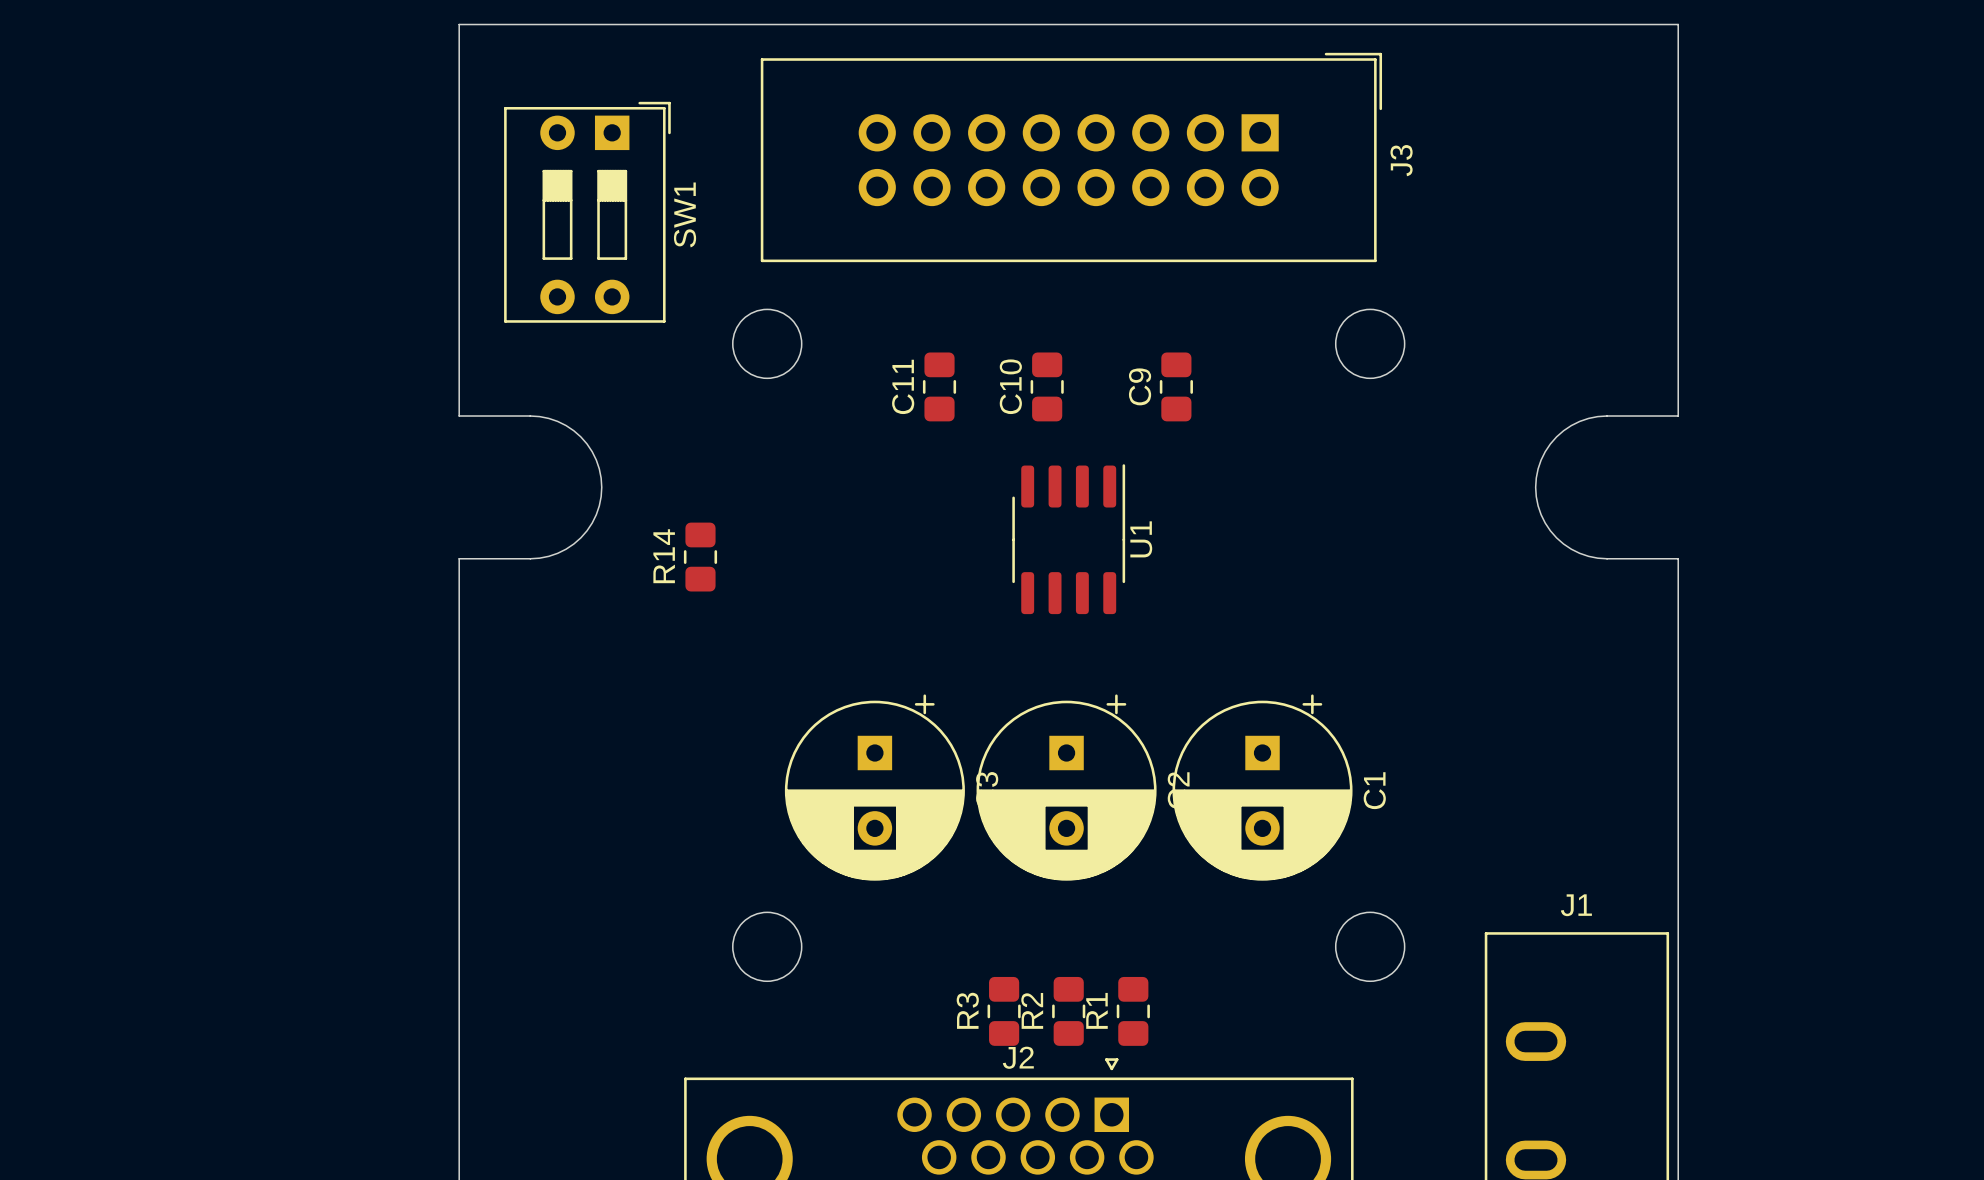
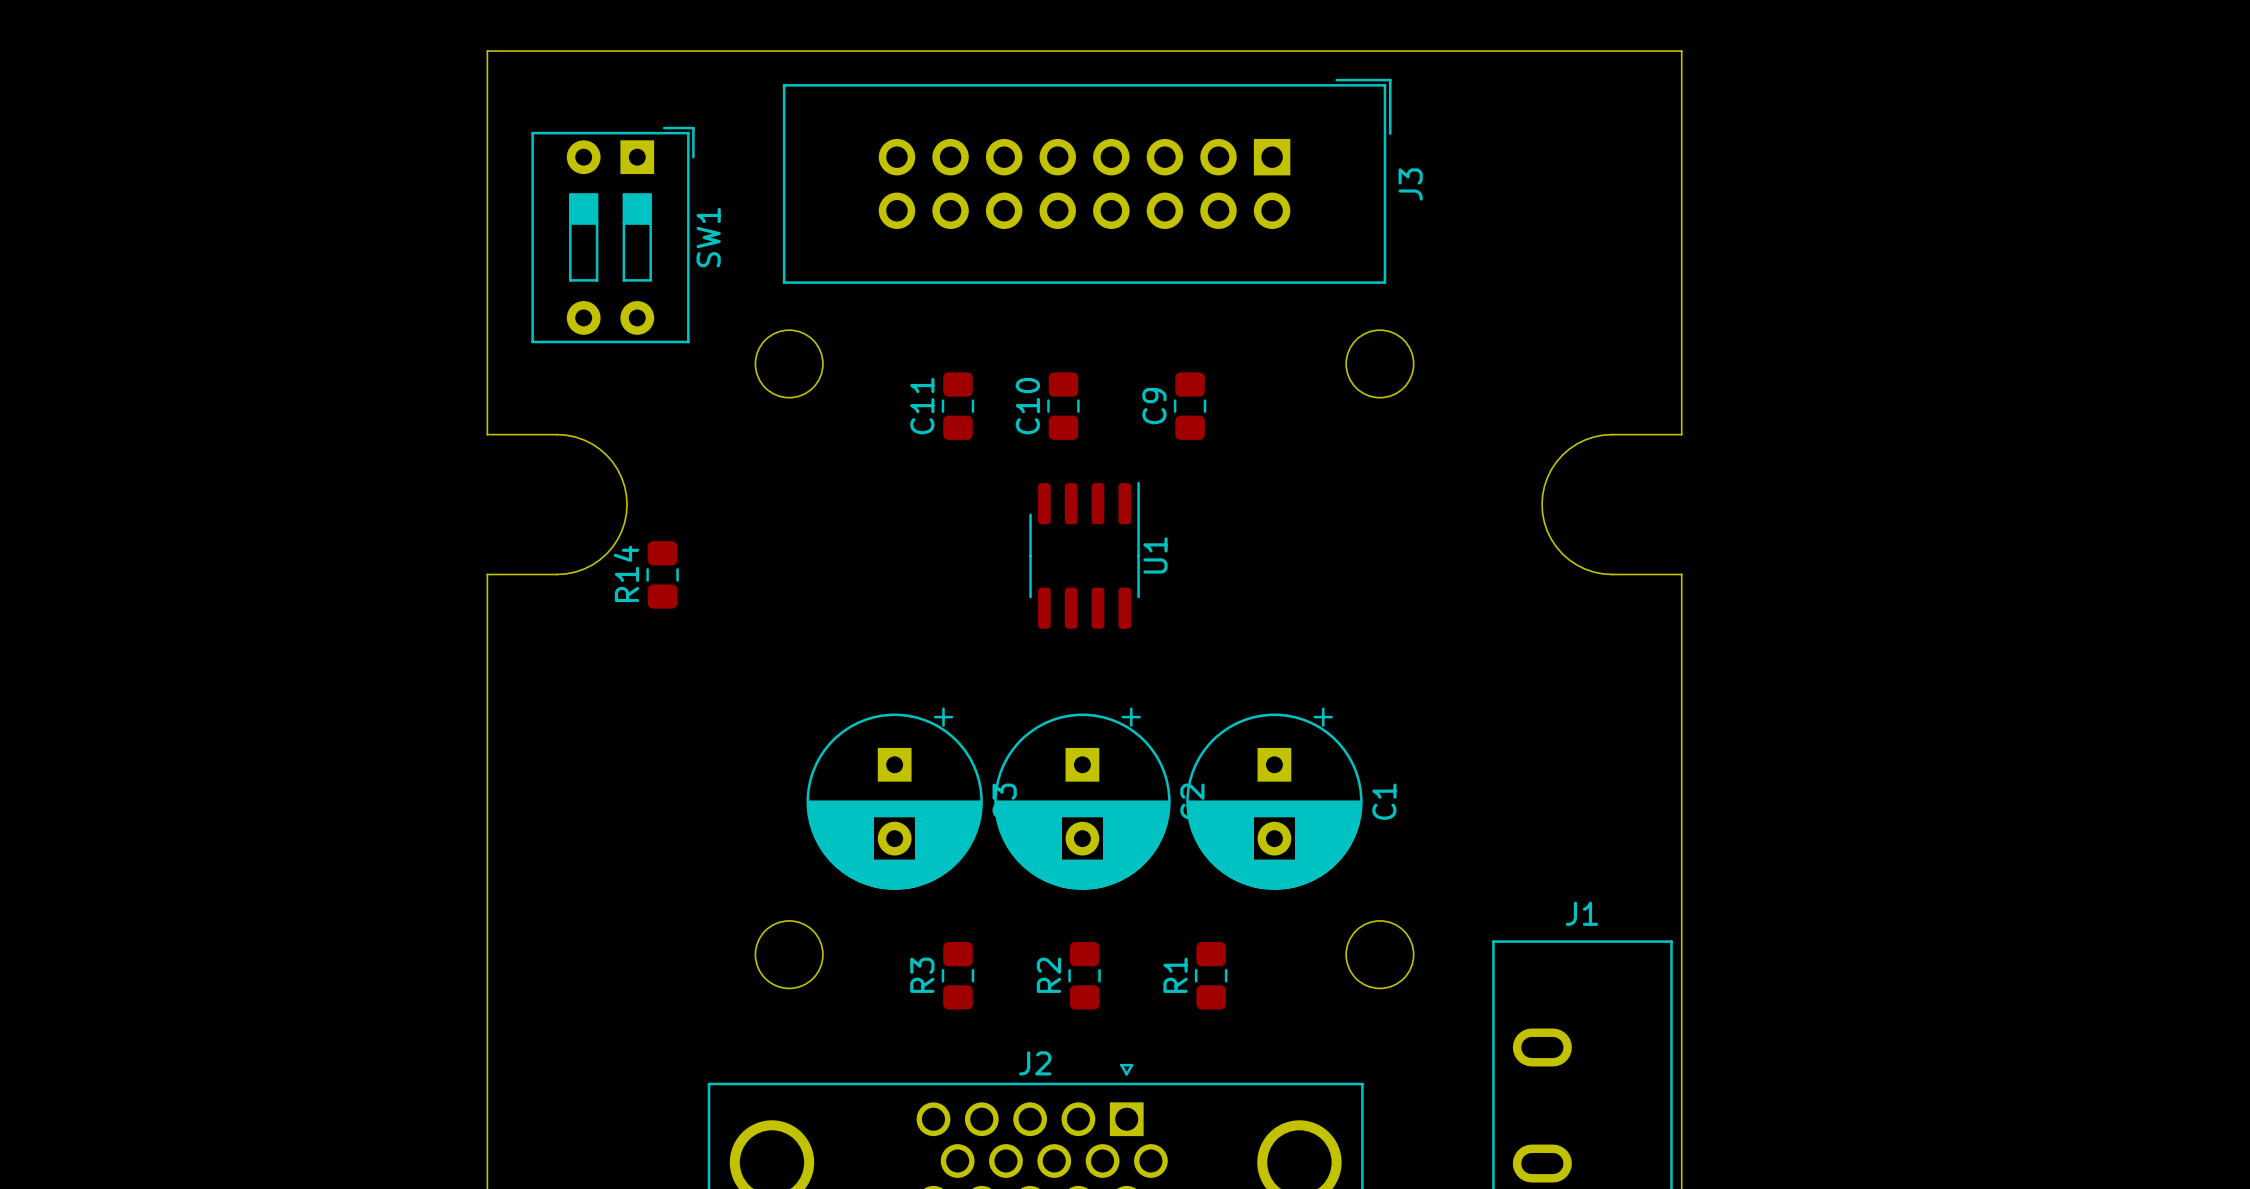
R14 position: (700, 557) -> (662, 574)
R3 position: (1004, 1011) -> (957, 975)
R2 position: (1068, 1011) -> (1084, 975)
R1 position: (1133, 1011) -> (1211, 975)

